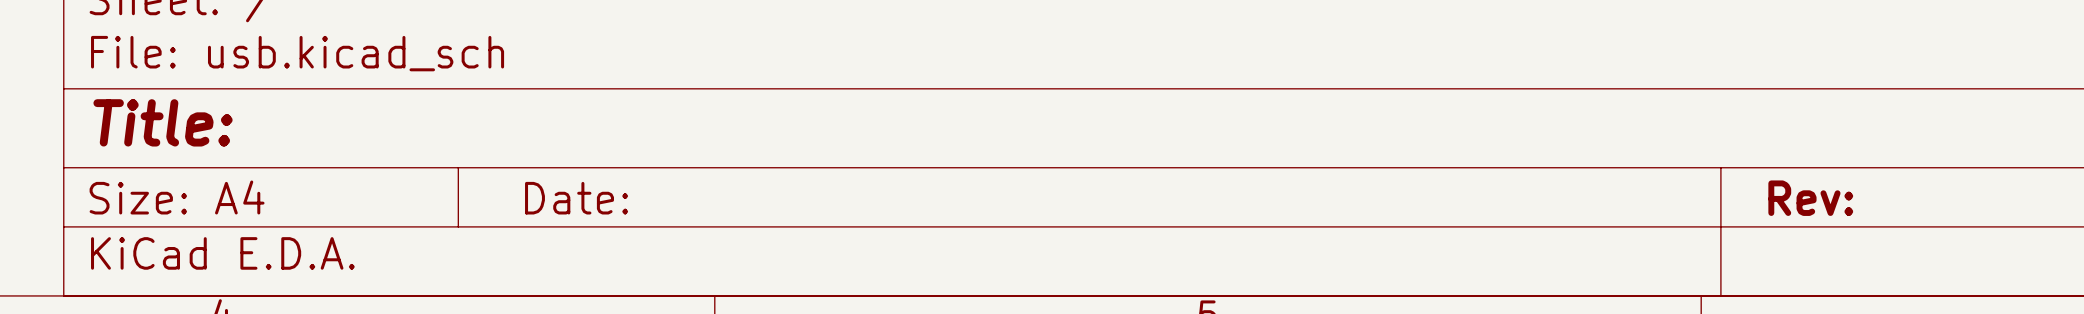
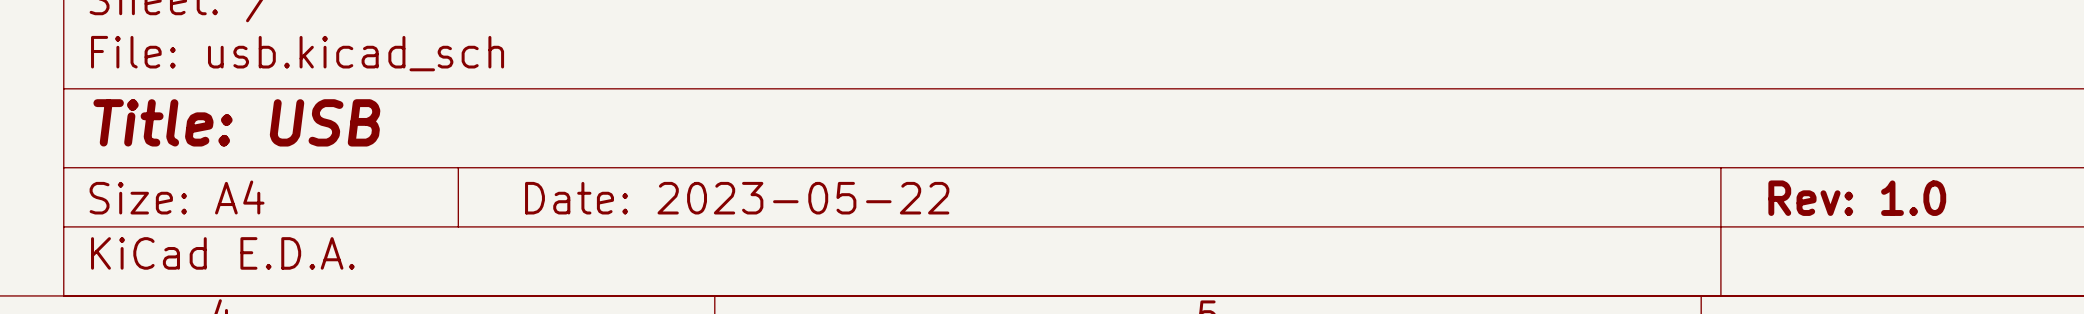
title block: Title: (163, 122) -> Title: USB (236, 122)
title block: Date: (576, 198) -> Date: 2023-05-22 (737, 198)
title block: Rev: (1810, 198) -> Rev: 1.0 (1857, 198)

